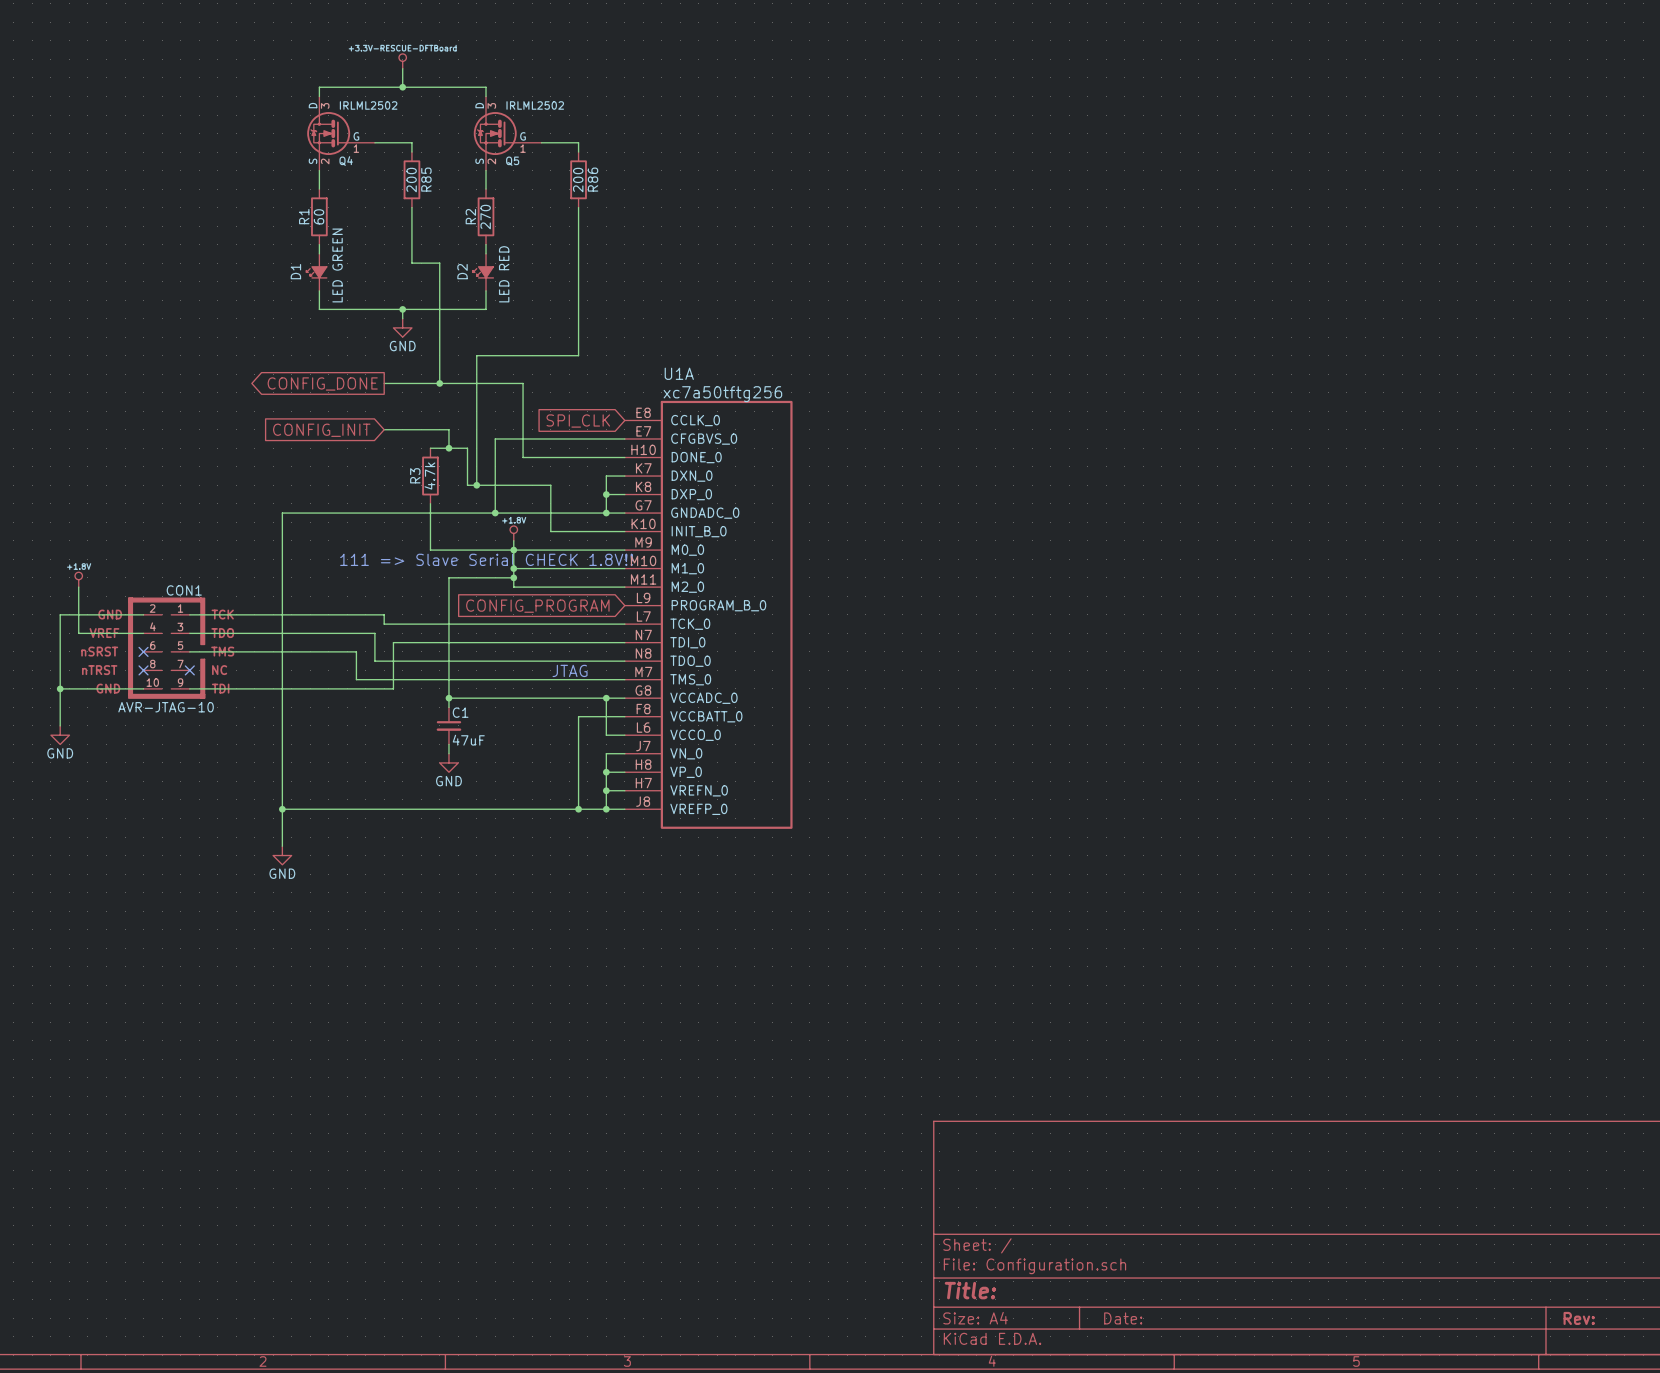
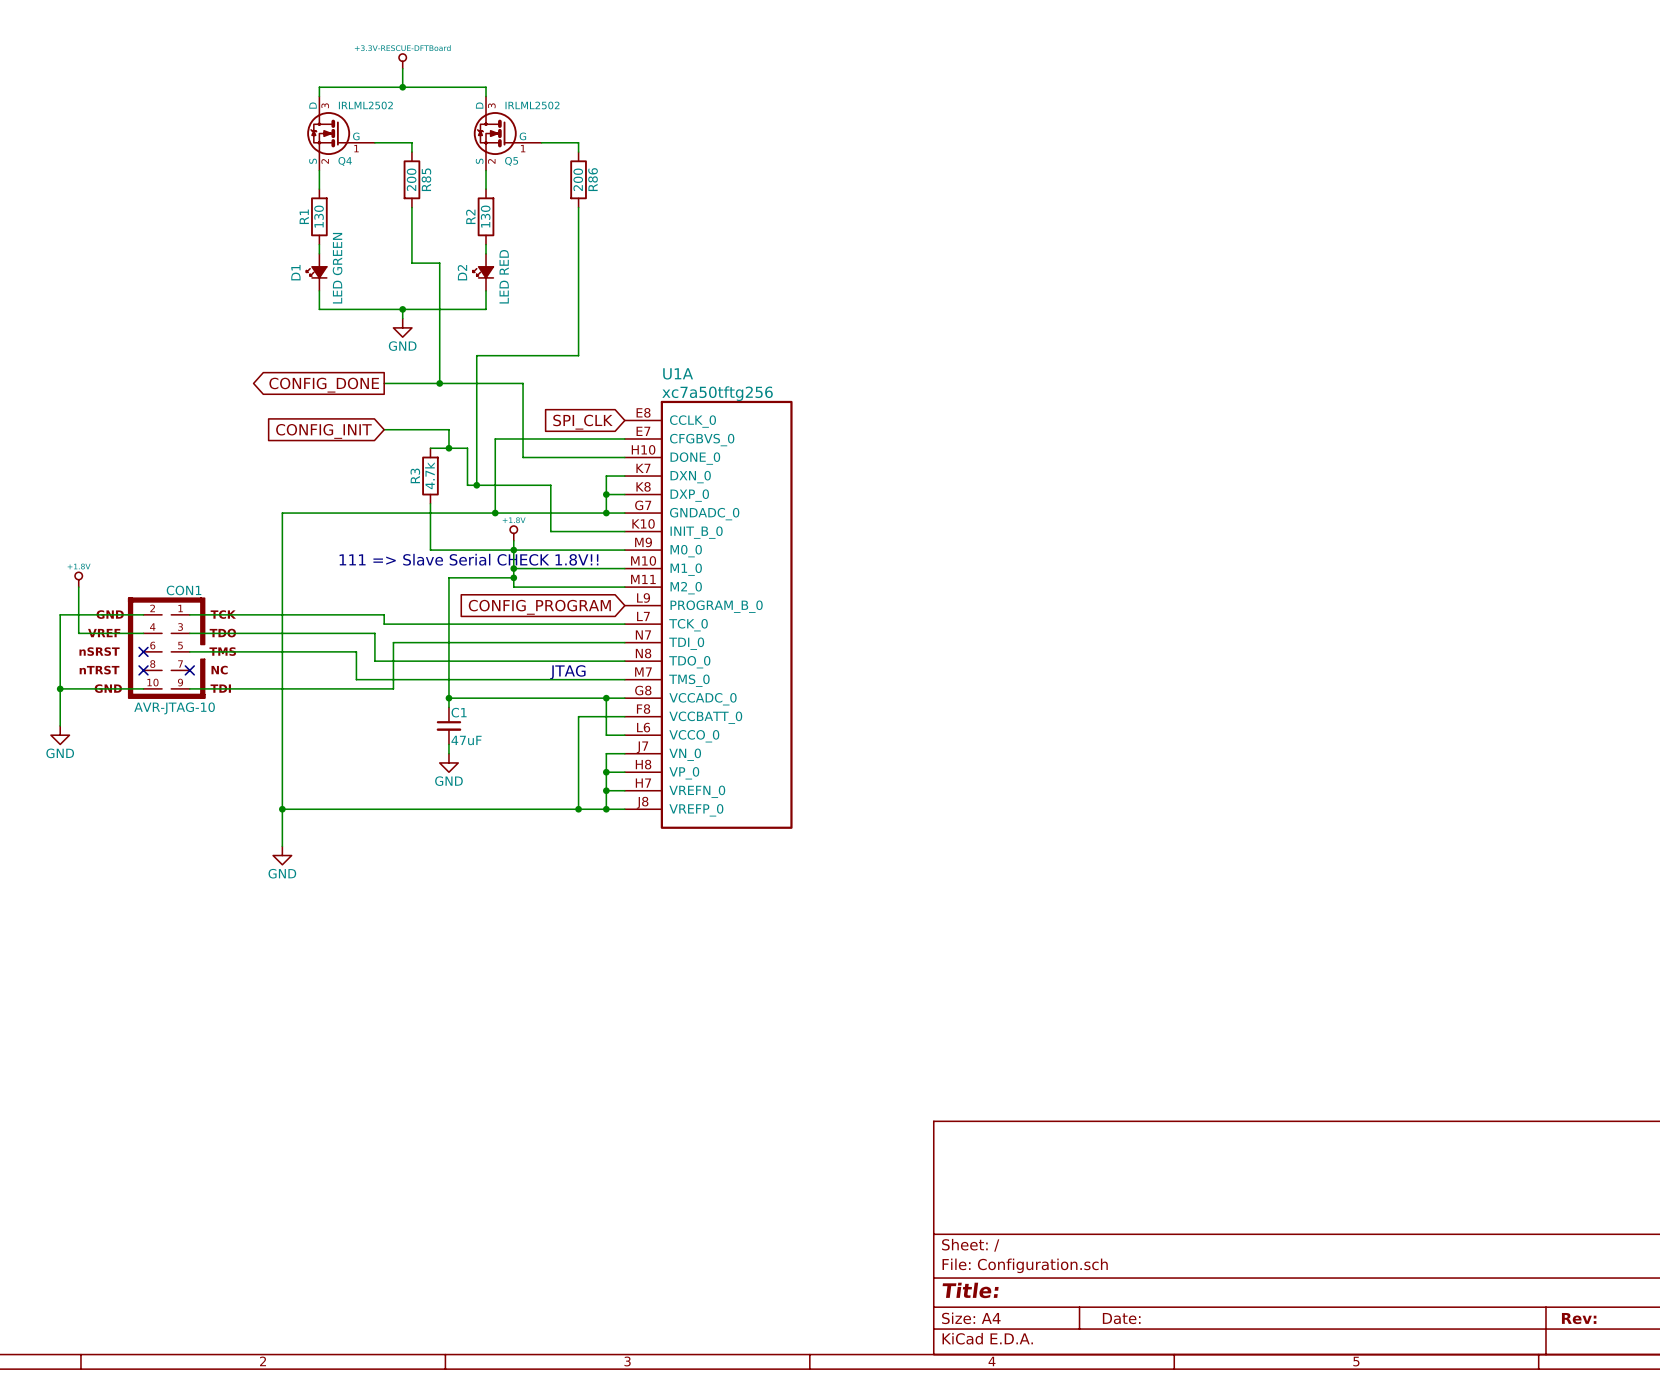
R1 value: 60 (319, 216) -> 130 (319, 216)
R2 value: 270 (485, 217) -> 130 (485, 216)

